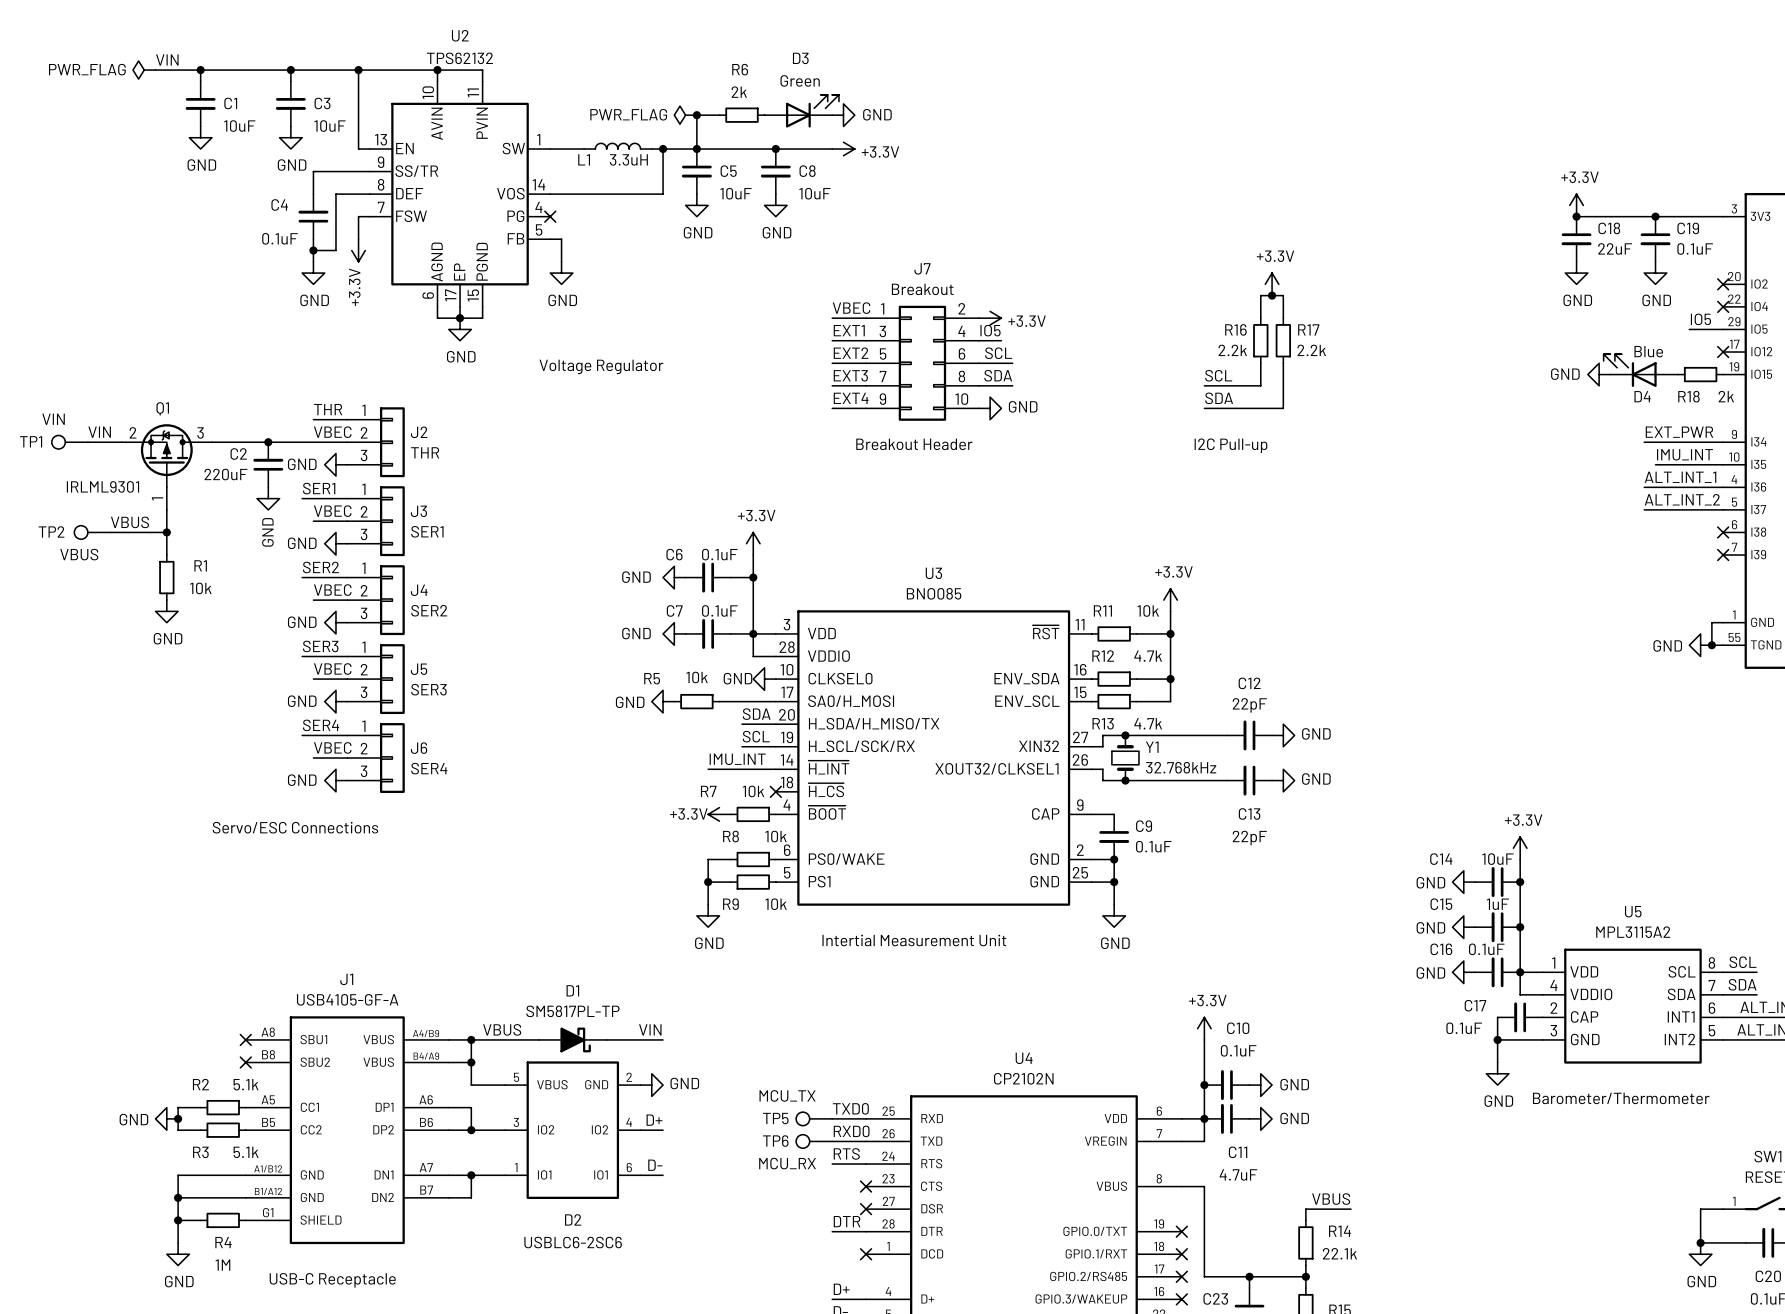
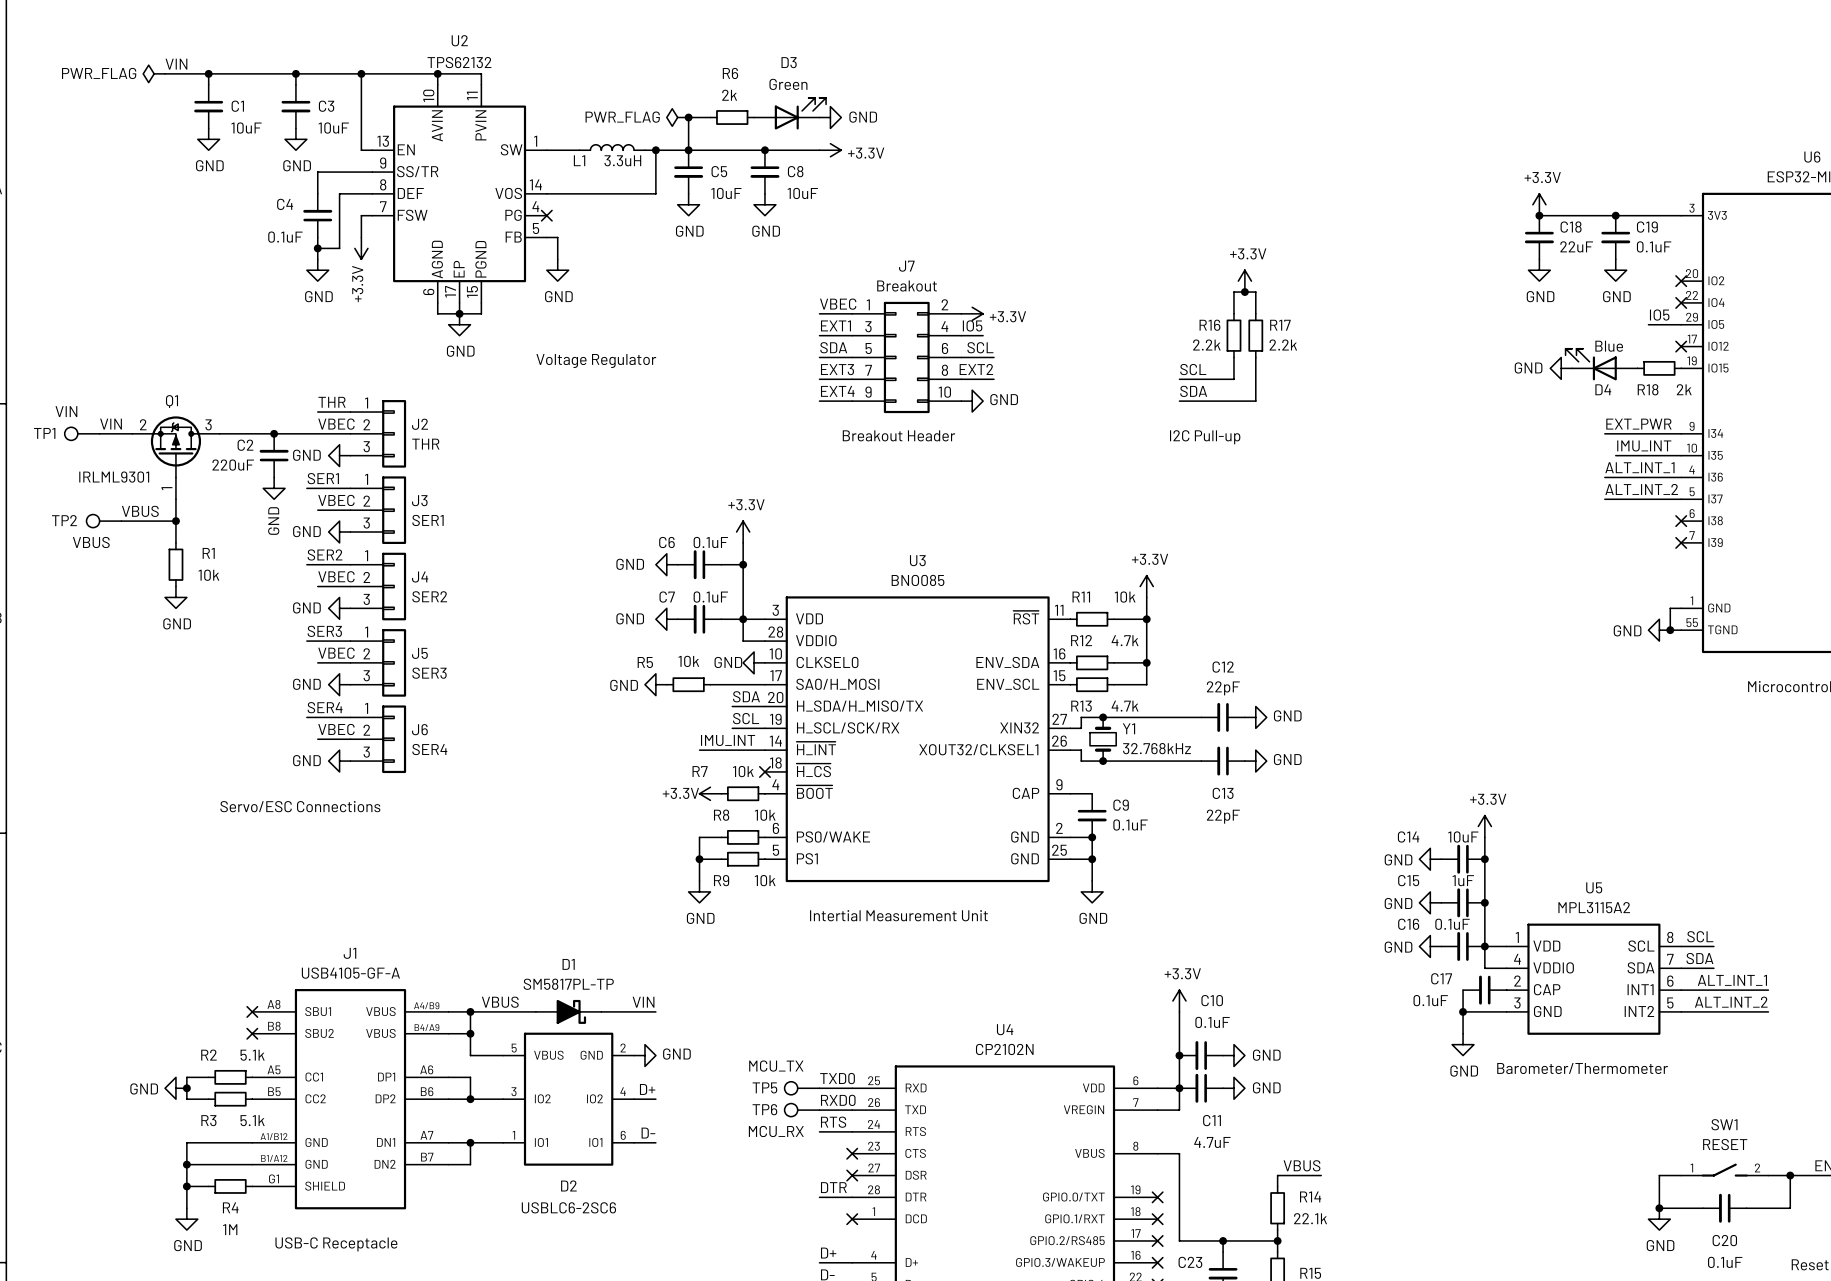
label: EXT2 (851, 353) -> SDA (833, 347)
label: SDA (998, 375) -> EXT2 (976, 369)

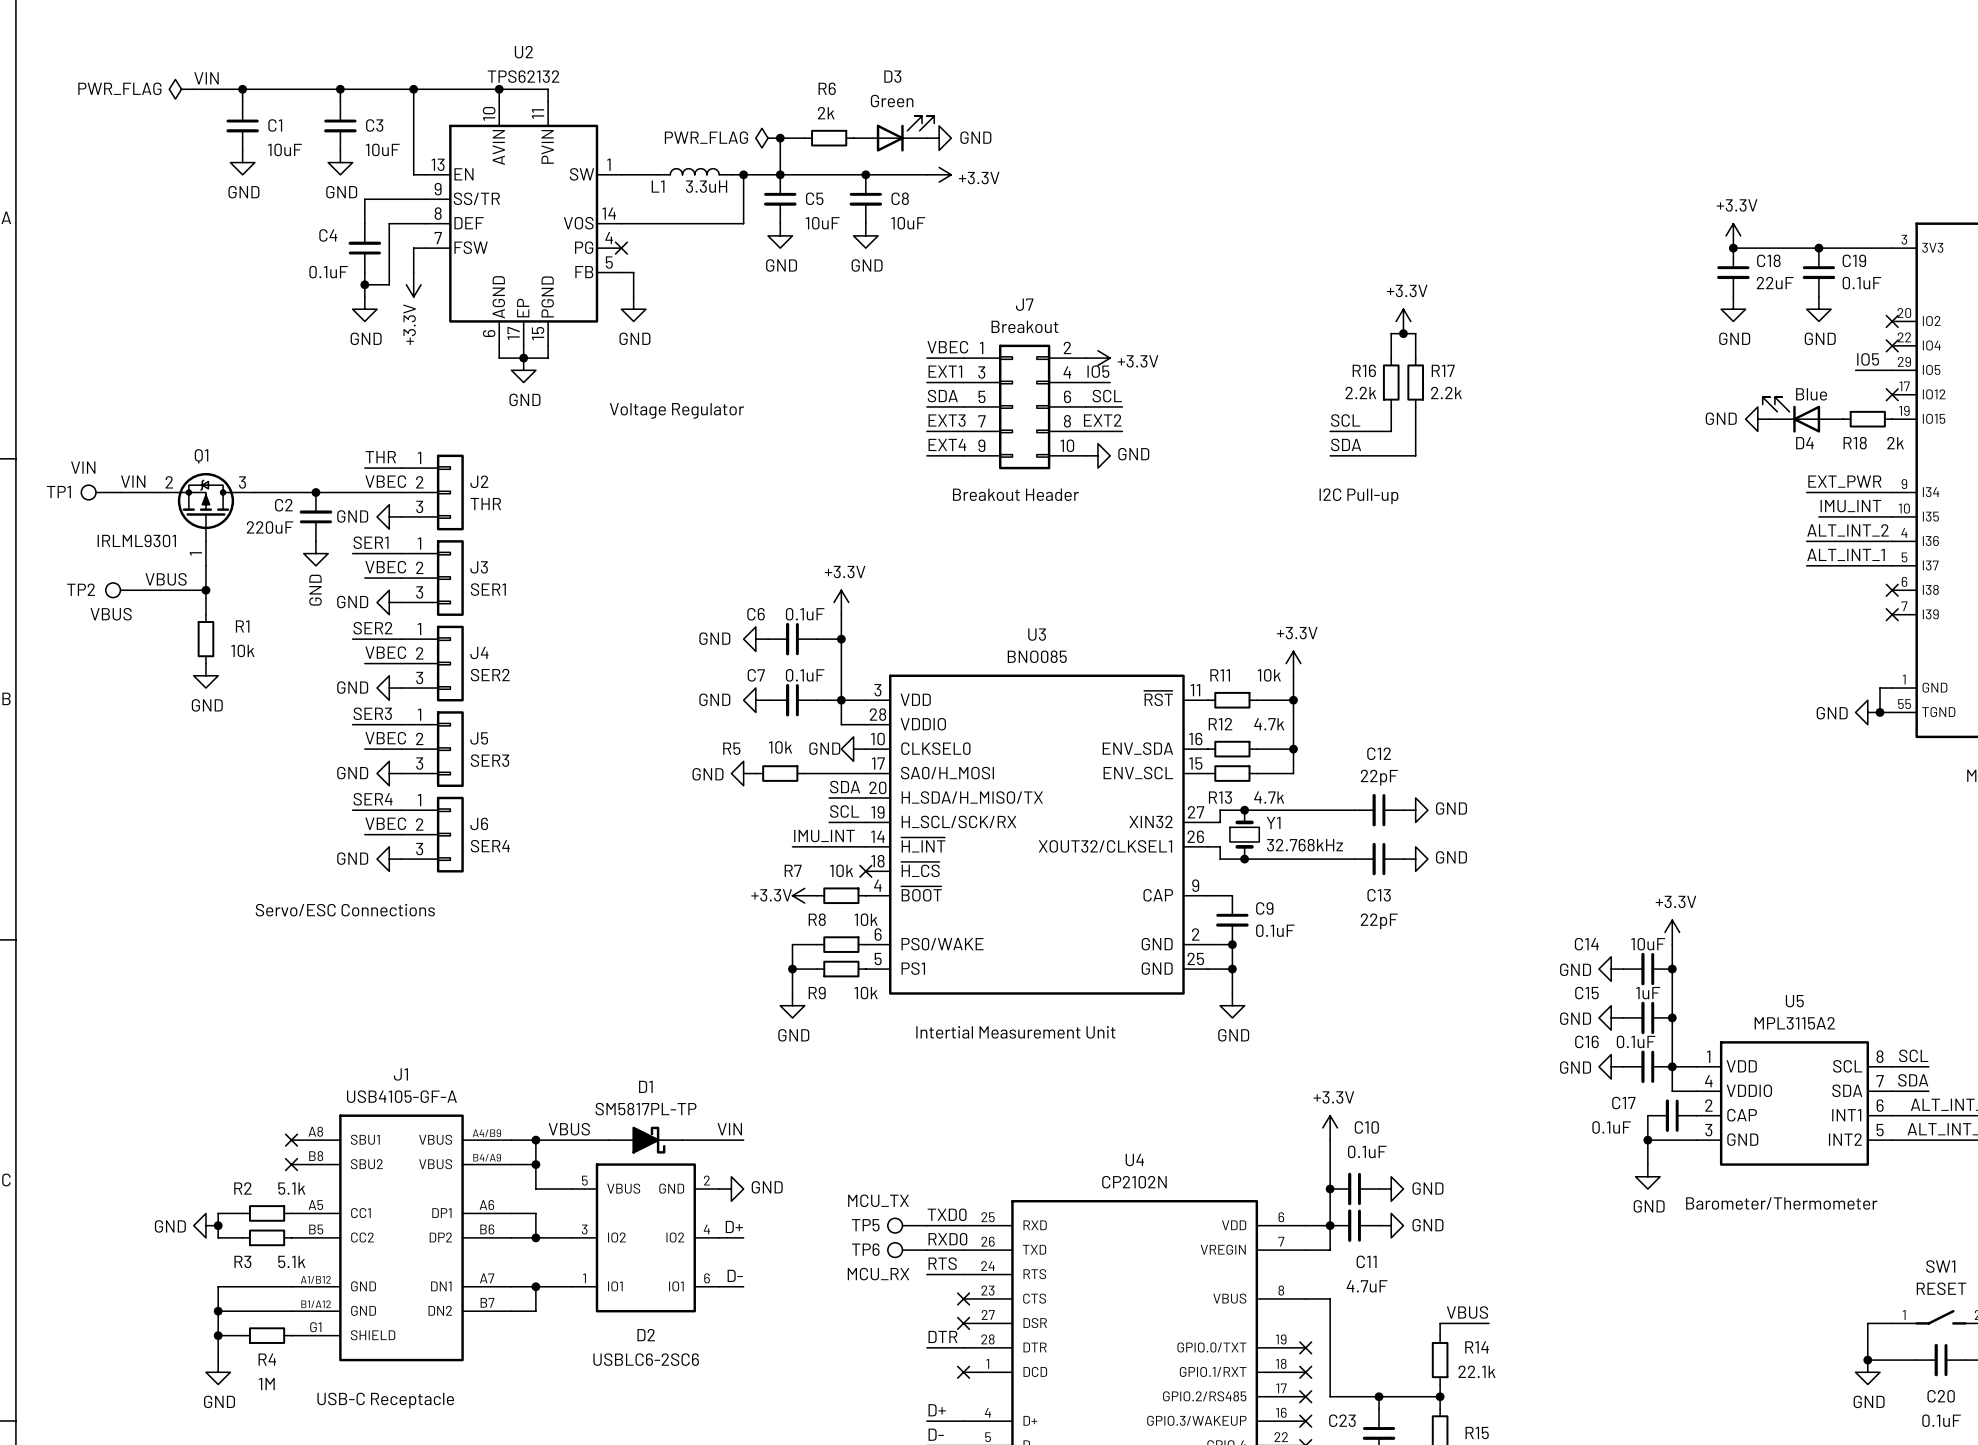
label: ALT_INT_1 (1639, 467) -> ALT_INT_2 (1847, 530)
label: ALT_INT_2 (1641, 489) -> ALT_INT_1 (1846, 554)

